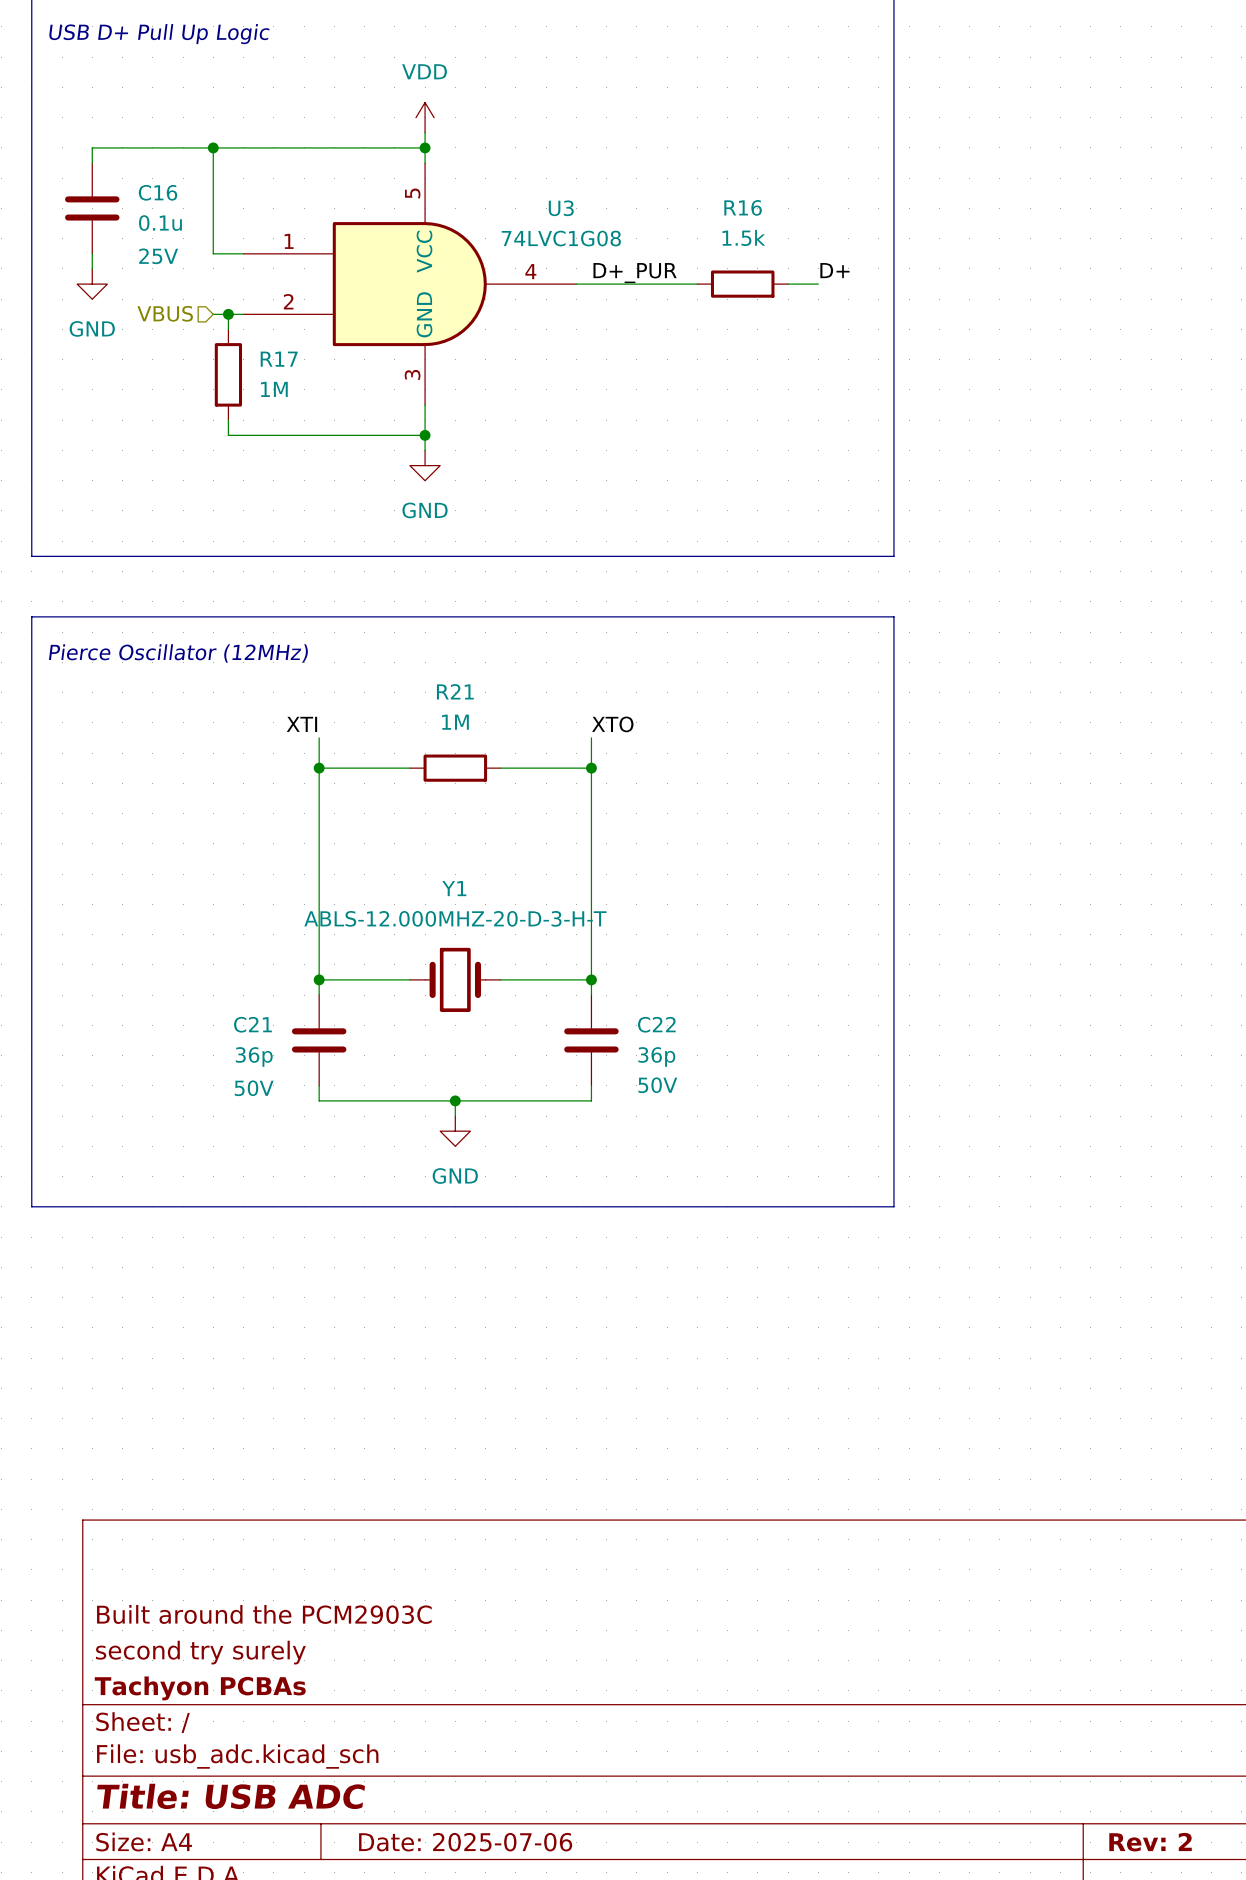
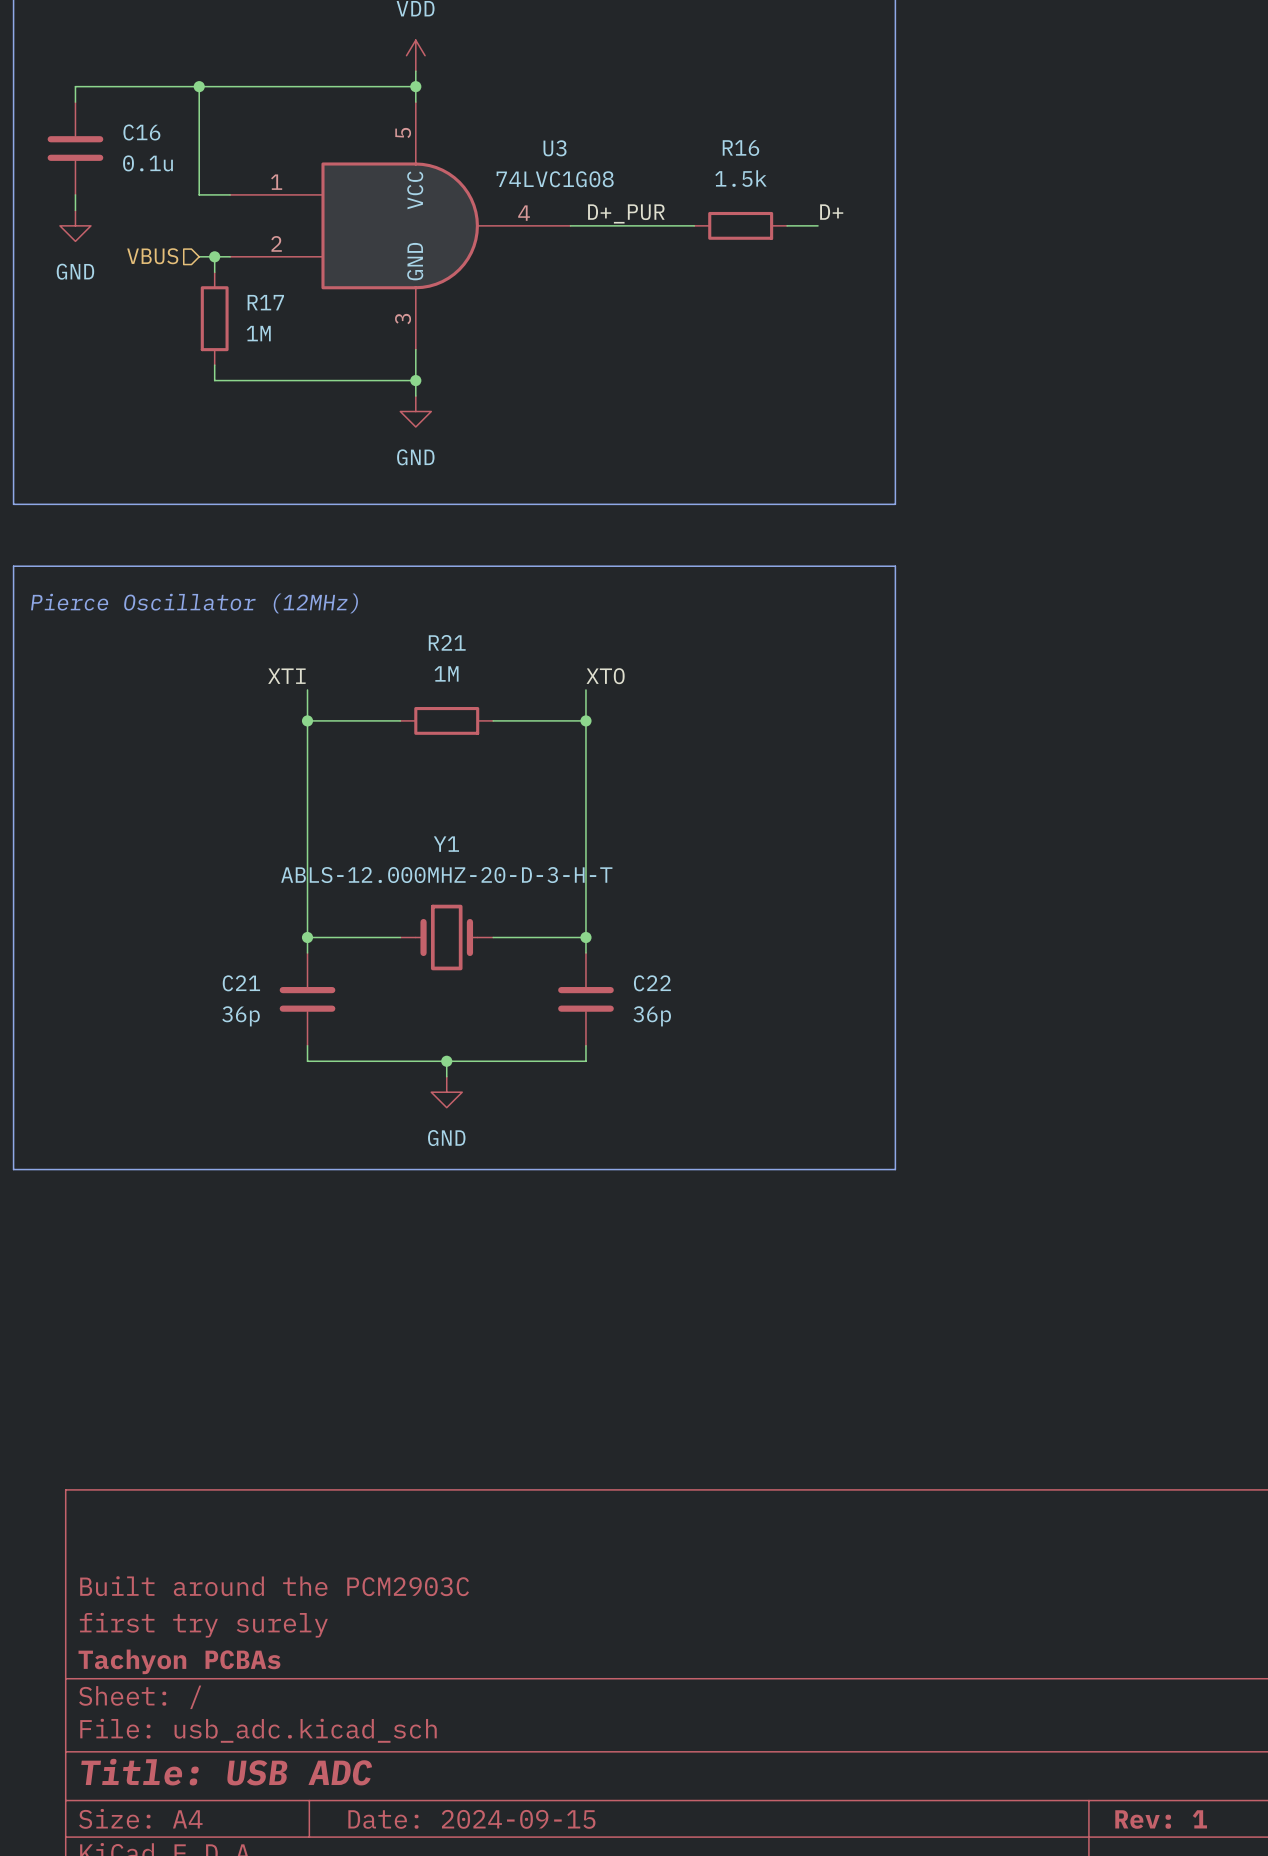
C16 text: 25V (158, 256) -> none
C22 text: 50V (657, 1085) -> none
C21 text: 50V (254, 1088) -> none
title block: second try surely (200, 1652) -> first try surely (203, 1625)
title block: Date: 2025-07-06 (465, 1842) -> Date: 2024-09-15 (471, 1819)
title block: Rev: 2 (1150, 1842) -> Rev: 1 (1161, 1819)

